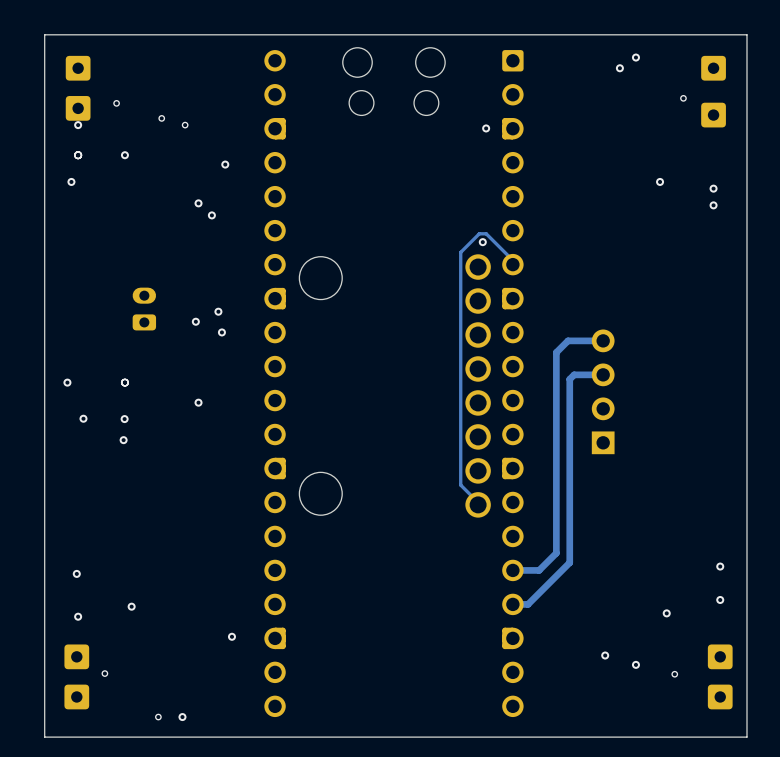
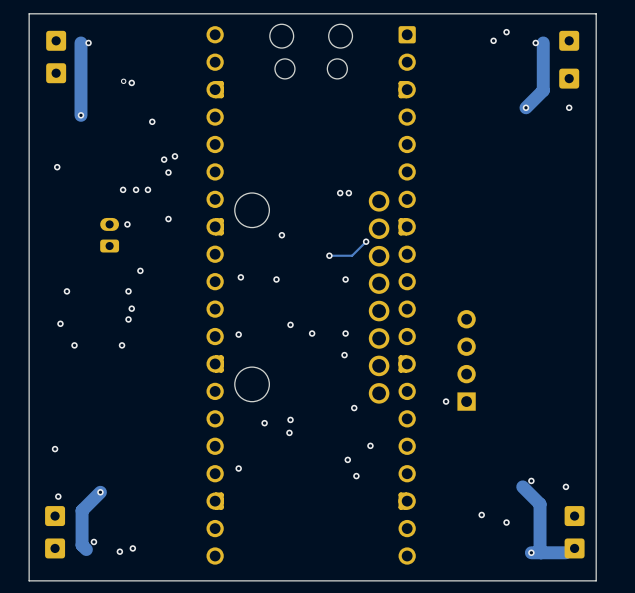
track: none -> (80, 42) (80, 115)
via: none -> (88, 42)
via: none -> (535, 42)
track: none -> (543, 42) (543, 90) (525, 107)
via: (683, 98) -> none
via: (116, 103) -> none
via: none -> (131, 82)
via: (78, 125) -> none
via: (185, 125) -> none
via: (486, 128) -> none
via: none -> (525, 107)
via: none -> (569, 107)
via: (78, 155) -> none
via: (124, 155) -> none
via: none -> (80, 115)
via: (225, 164) -> none
via: none -> (152, 121)
via: (71, 181) -> none
via: (660, 181) -> none
via: (713, 188) -> none
via: (198, 203) -> none
via: (713, 205) -> none
via: none -> (174, 156)
via: none -> (57, 167)
via: none -> (168, 172)
via: (482, 242) -> none
via: none -> (123, 189)
via: none -> (136, 189)
via: none -> (147, 189)
via: none -> (340, 193)
via: none -> (348, 193)
track: (512, 260) (486, 233) (479, 233) (460, 252) (460, 485) (480, 504) -> none
via: none -> (168, 219)
via: none -> (127, 224)
via: none -> (281, 235)
via: (218, 311) -> none
track: none -> (366, 241) (352, 255) (329, 255)
via: none -> (366, 241)
via: (195, 321) -> none
via: (221, 332) -> none
via: none -> (329, 255)
track: (603, 340) (568, 340) (556, 352) (556, 553) (539, 570) (512, 570) -> none
via: none -> (140, 270)
via: none -> (240, 277)
via: none -> (276, 279)
via: none -> (345, 279)
track: (603, 374) (574, 374) (569, 379) (569, 562) (528, 604) (512, 604) -> none
via: none -> (66, 291)
via: none -> (128, 291)
via: (67, 382) -> none
via: (124, 382) -> none
part position: (603, 391) -> (466, 360)
via: none -> (131, 308)
via: (198, 402) -> none
via: none -> (128, 319)
via: (124, 419) -> none
via: none -> (290, 324)
via: none -> (312, 333)
via: none -> (345, 333)
via: none -> (238, 334)
via: (123, 440) -> none
via: none -> (74, 345)
via: none -> (122, 345)
via: none -> (344, 355)
via: none -> (446, 401)
via: none -> (354, 408)
via: none -> (290, 419)
via: none -> (264, 423)
via: none -> (289, 432)
via: (720, 566) -> none
via: none -> (370, 445)
via: none -> (347, 459)
via: none -> (238, 468)
via position: (720, 599) -> (565, 486)
via position: (131, 606) -> (100, 492)
via: none -> (356, 476)
via position: (78, 616) -> (58, 496)
track: none -> (522, 486) (540, 504) (541, 552)
track: none -> (100, 492) (82, 510) (82, 545) (86, 549)
via: (231, 636) -> none
via: (104, 673) -> none
via: (674, 674) -> none
via: none -> (93, 541)
via: none -> (132, 548)
via: none -> (119, 551)
via: none -> (531, 552)
track: none -> (565, 552) (531, 552)
via: (158, 717) -> none
via: (182, 717) -> none

